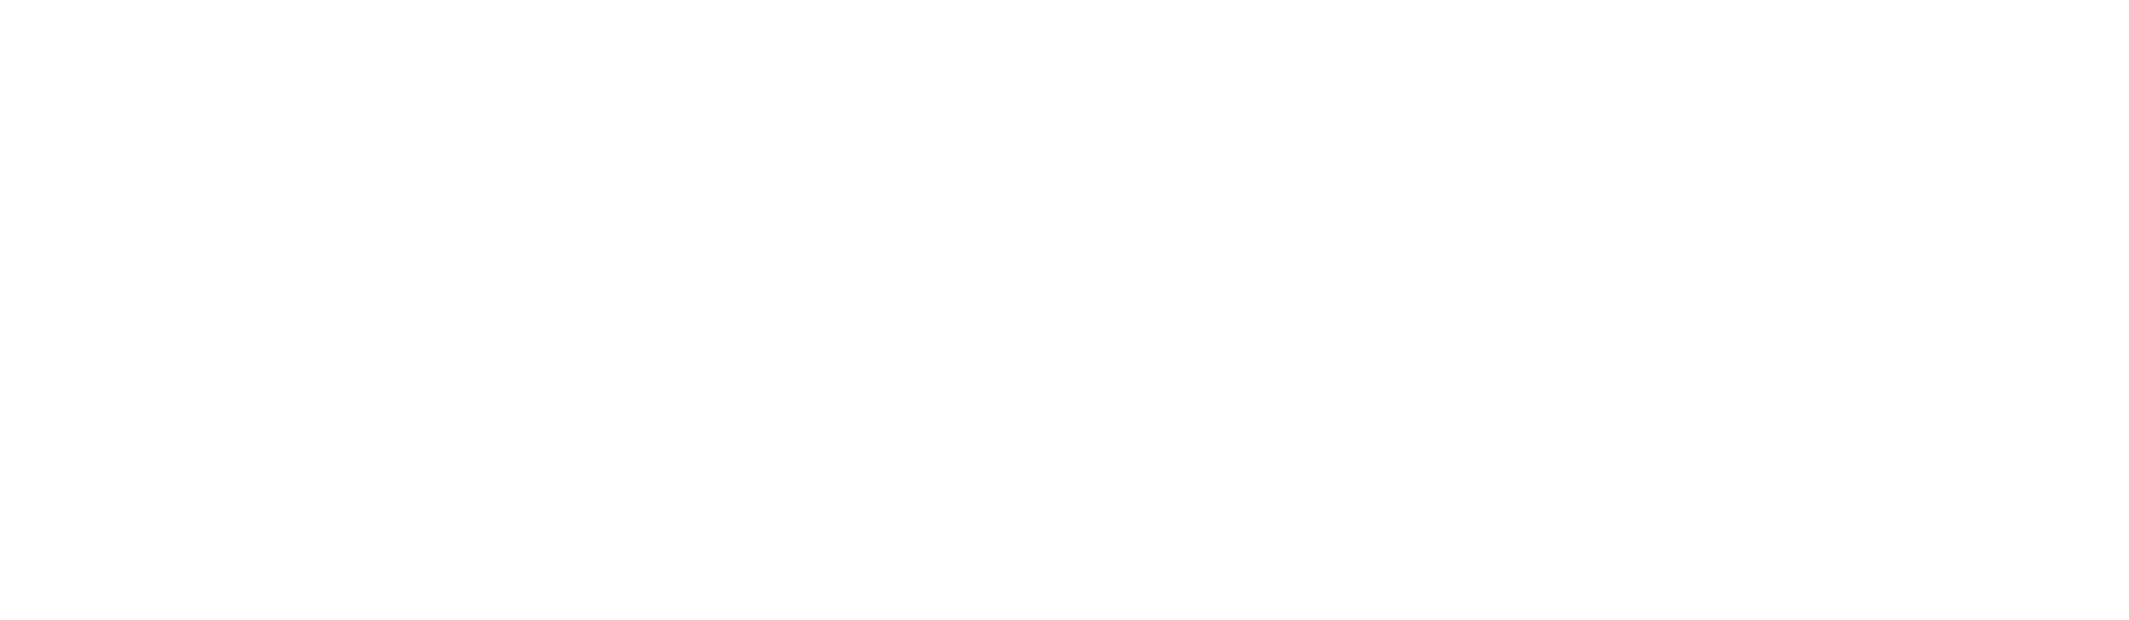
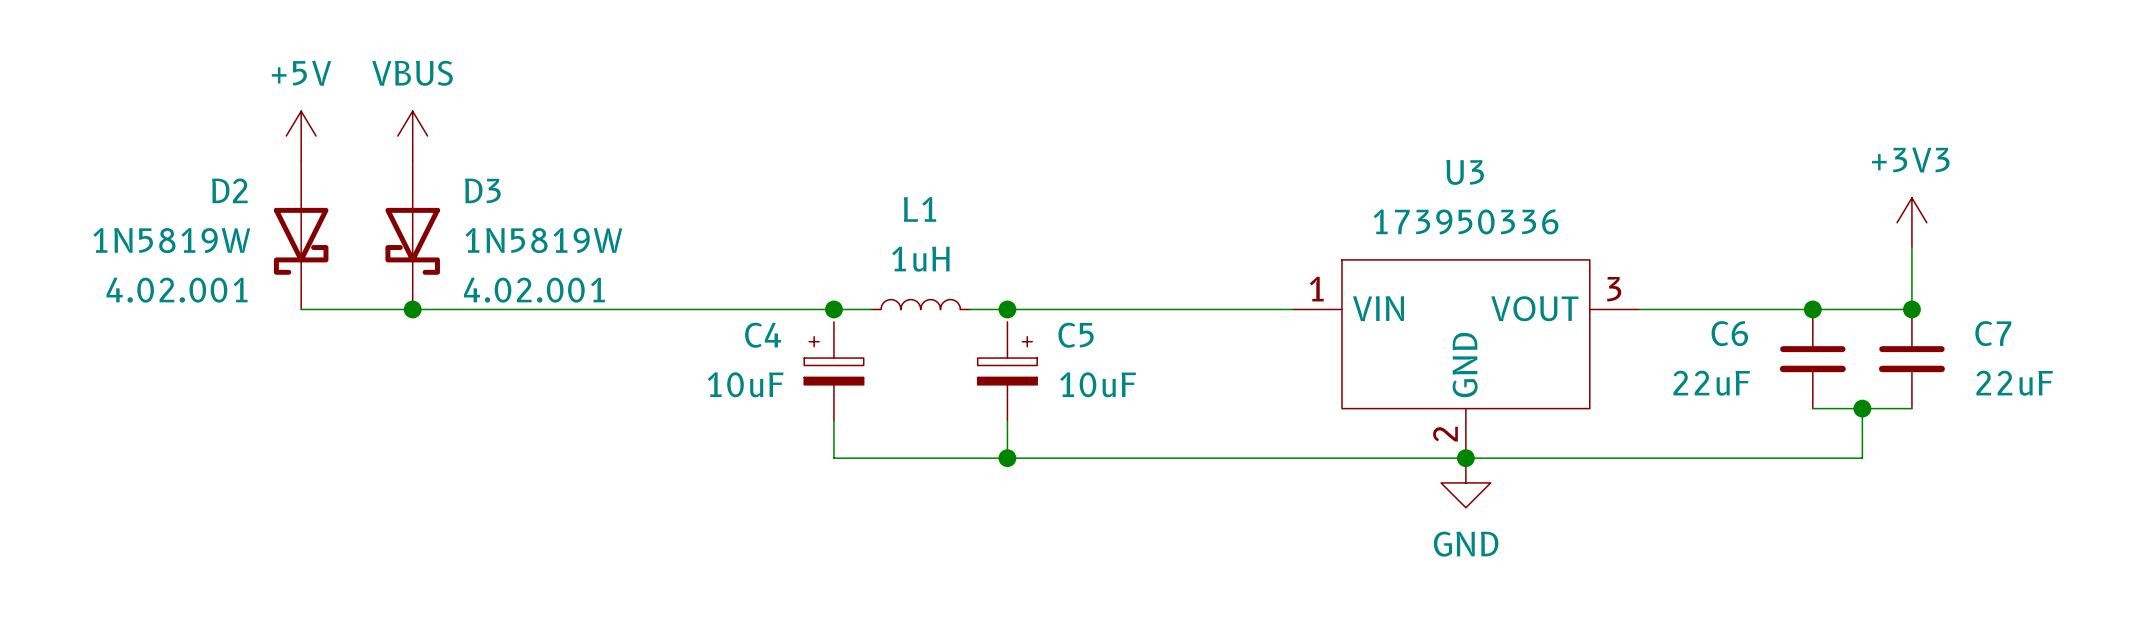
power symbol: none -> +5V (301, 136)
power symbol: none -> VBUS (412, 136)
power symbol: none -> +3V3 (1911, 222)
D2: none -> 1N5819W (301, 235)
D3: none -> 1N5819W (412, 235)
wire: none -> (1911, 247) (1911, 309) (1639, 309)
L1: none -> 1uH (920, 304)
wire: none -> (301, 309) (871, 309)
junction: none -> (412, 309)
junction: none -> (833, 309)
wire: none -> (970, 309) (1292, 309)
junction: none -> (1007, 309)
junction: none -> (1812, 309)
junction: none -> (1911, 309)
U3: none -> 173950336 (1465, 359)
C6: none -> 22uF (1812, 359)
C7: none -> 22uF (1911, 359)
C4: none -> 10uF (833, 371)
C5: none -> 10uF (1007, 371)
wire: none -> (1812, 408) (1911, 408)
wire: none -> (1862, 408) (1862, 458) (833, 458) (833, 420)
junction: none -> (1862, 408)
wire: none -> (1007, 420) (1007, 458)
junction: none -> (1007, 458)
junction: none -> (1465, 458)
power symbol: none -> GND (1465, 482)

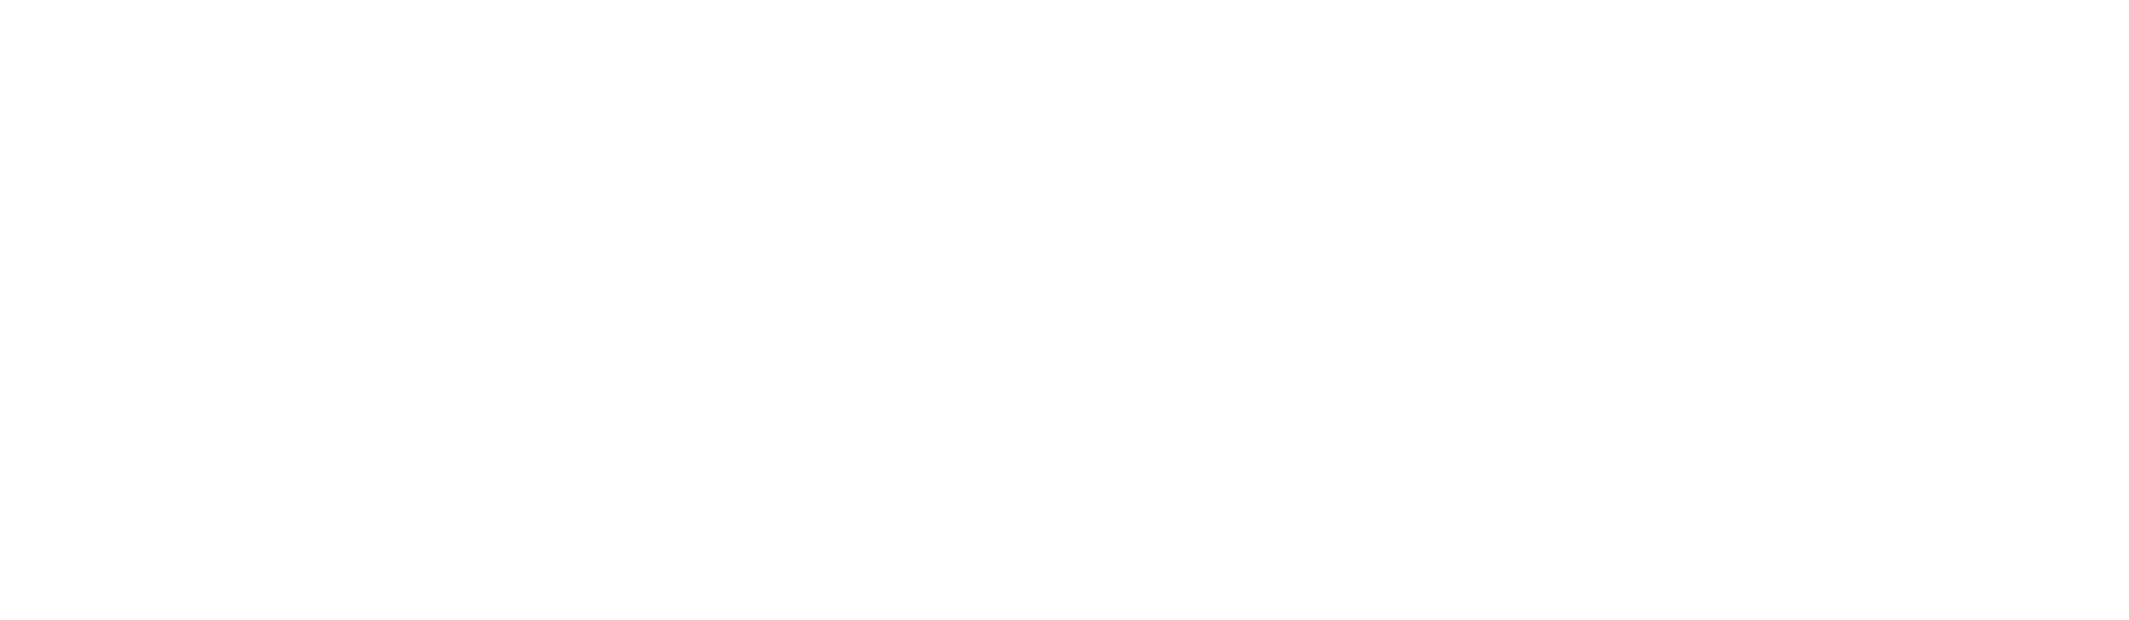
power symbol: +5V (301, 136) -> none
power symbol: VBUS (412, 136) -> none
power symbol: +3V3 (1911, 222) -> none
D2: 1N5819W (301, 235) -> none
D3: 1N5819W (412, 235) -> none
wire: (1911, 247) (1911, 309) (1639, 309) -> none
L1: 1uH (920, 304) -> none
wire: (301, 309) (871, 309) -> none
junction: (412, 309) -> none
junction: (833, 309) -> none
wire: (970, 309) (1292, 309) -> none
junction: (1007, 309) -> none
junction: (1812, 309) -> none
junction: (1911, 309) -> none
U3: 173950336 (1465, 359) -> none
C6: 22uF (1812, 359) -> none
C7: 22uF (1911, 359) -> none
C4: 10uF (833, 371) -> none
C5: 10uF (1007, 371) -> none
wire: (1812, 408) (1911, 408) -> none
wire: (1862, 408) (1862, 458) (833, 458) (833, 420) -> none
junction: (1862, 408) -> none
wire: (1007, 420) (1007, 458) -> none
junction: (1007, 458) -> none
junction: (1465, 458) -> none
power symbol: GND (1465, 482) -> none

